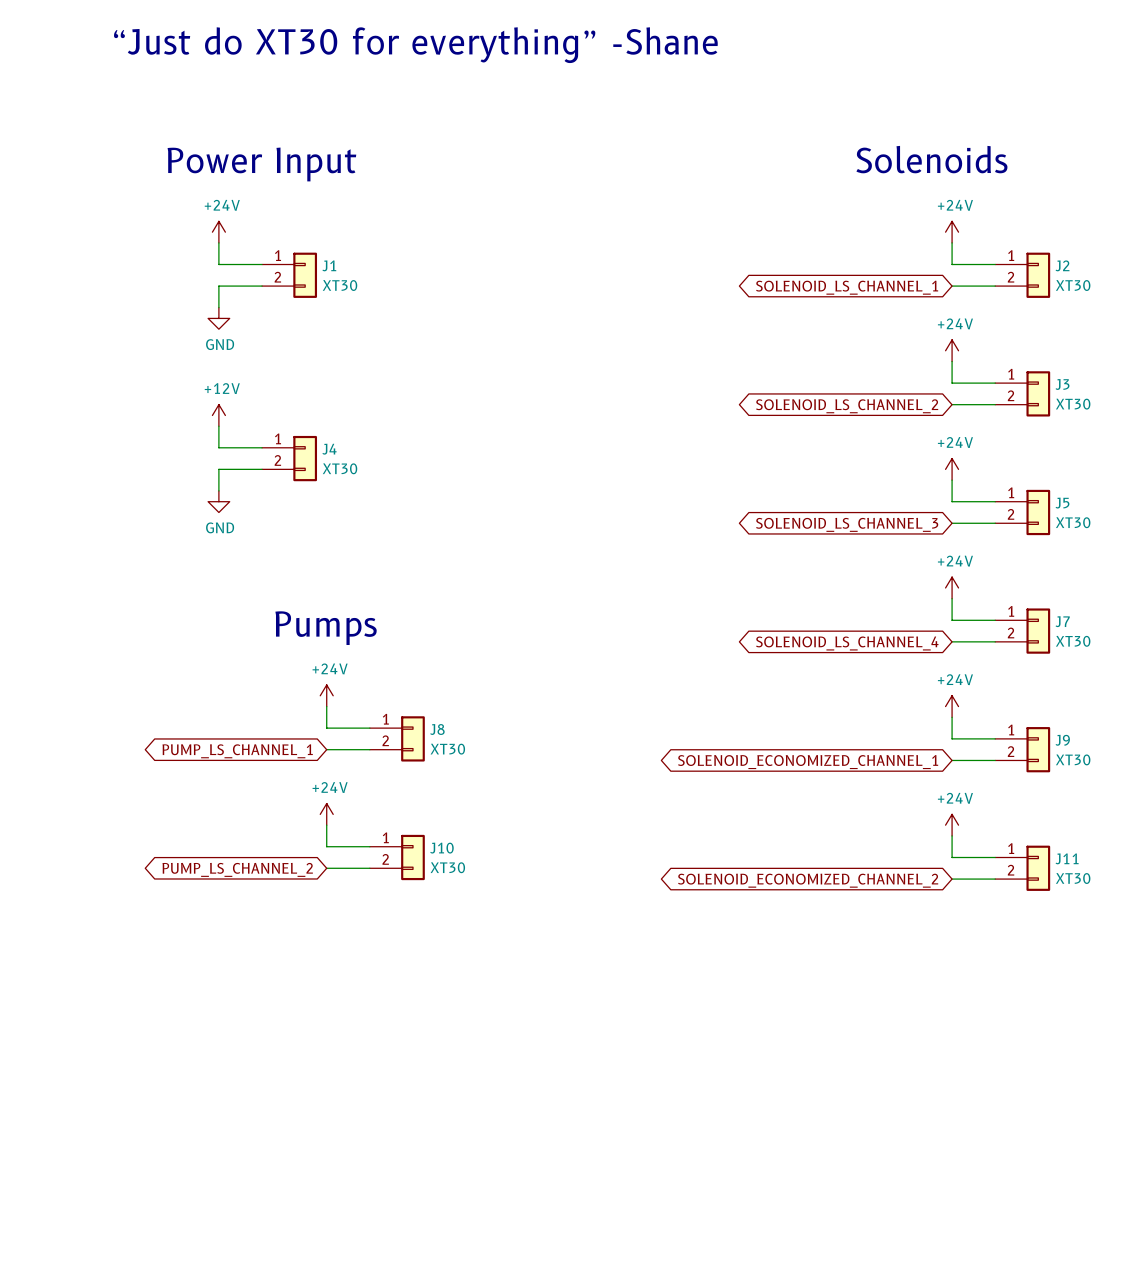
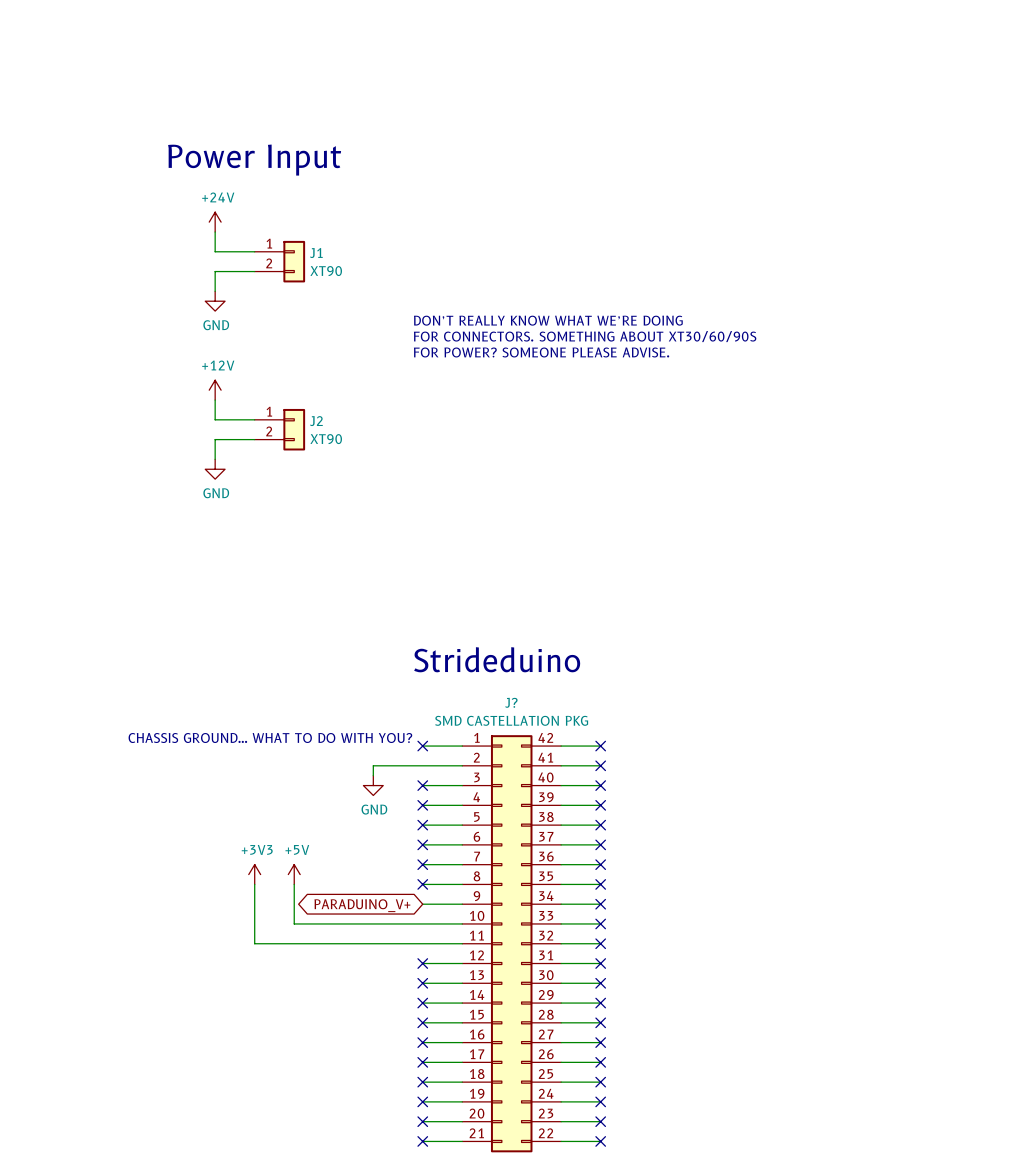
text: “Just do XT30 for everything” -Shane (415, 45) -> none
text: Solenoids (931, 159) -> none
power symbol: +24V (952, 232) -> none
wire: (952, 242) (952, 264) (995, 264) -> none
J2: XT30 (1022, 275) -> none
J1 value: XT30 (340, 285) -> XT90 (326, 271)
wire: (952, 286) (995, 286) -> none
global label: SOLENOID_LS_CHANNEL_1 (847, 287) -> none
text: none -> DON’T REALLY KNOW WHAT WE’RE DOING (548, 320)
power symbol: +24V (952, 350) -> none
text: none -> FOR CONNECTORS. SOMETHING ABOUT XT30/60/90S (585, 336)
wire: (952, 361) (952, 383) (995, 383) -> none
text: none -> FOR POWER? SOMEONE PLEASE ADVISE. (541, 352)
J3: XT30 (1022, 393) -> none
wire: (952, 404) (995, 404) -> none
global label: SOLENOID_LS_CHANNEL_2 (847, 406) -> none
J4 name: J4 (329, 449) -> J2 (316, 421)
J4 value: XT30 (340, 468) -> XT90 (326, 439)
power symbol: +24V (952, 469) -> none
wire: (952, 480) (952, 501) (995, 501) -> none
J5: XT30 (1022, 512) -> none
wire: (952, 523) (995, 523) -> none
global label: SOLENOID_LS_CHANNEL_3 (847, 524) -> none
power symbol: +24V (952, 587) -> none
wire: (952, 598) (952, 620) (995, 620) -> none
text: Pumps (326, 628) -> none
J7: XT30 (1022, 631) -> none
wire: (952, 641) (995, 641) -> none
global label: SOLENOID_LS_CHANNEL_4 (847, 643) -> none
power symbol: +24V (326, 695) -> none
wire: (326, 706) (326, 728) (369, 728) -> none
power symbol: +24V (952, 706) -> none
text: none -> Strideduino (497, 659)
wire: (952, 717) (952, 738) (995, 738) -> none
J8: XT30 (397, 738) -> none
wire: (326, 749) (369, 749) -> (422, 746) (462, 746)
J9: XT30 (1022, 749) -> none
global label: PUMP_LS_CHANNEL_1 (237, 751) -> none
wire: (952, 760) (995, 760) -> none
global label: SOLENOID_ECONOMIZED_CHANNEL_1 (808, 762) -> none
text: none -> CHASSIS GROUND… WHAT TO DO WITH YOU? (270, 737)
no-connect mark: none -> (422, 746)
wire: none -> (561, 746) (600, 746)
no-connect mark: none -> (600, 746)
power symbol: +24V (326, 814) -> none
wire: (326, 825) (326, 846) (369, 846) -> none
wire: none -> (462, 765) (373, 765) (373, 775)
wire: none -> (561, 765) (600, 765)
no-connect mark: none -> (600, 765)
power symbol: +24V (952, 825) -> none
wire: (952, 835) (952, 857) (995, 857) -> none
power symbol: none -> GND (373, 785)
wire: none -> (422, 785) (462, 785)
no-connect mark: none -> (422, 785)
wire: none -> (561, 785) (600, 785)
no-connect mark: none -> (600, 785)
J10: XT30 (397, 857) -> none
wire: (326, 868) (369, 868) -> (422, 805) (462, 805)
no-connect mark: none -> (422, 805)
wire: none -> (561, 805) (600, 805)
no-connect mark: none -> (600, 805)
J11: XT30 (1022, 868) -> none
global label: PUMP_LS_CHANNEL_2 (237, 869) -> none
wire: (952, 879) (995, 879) -> none
global label: SOLENOID_ECONOMIZED_CHANNEL_2 (808, 880) -> none
wire: none -> (422, 825) (462, 825)
no-connect mark: none -> (422, 825)
wire: none -> (561, 825) (600, 825)
no-connect mark: none -> (600, 825)
wire: none -> (422, 844) (462, 844)
no-connect mark: none -> (422, 844)
wire: none -> (561, 844) (600, 844)
no-connect mark: none -> (600, 844)
wire: none -> (422, 864) (462, 864)
no-connect mark: none -> (422, 864)
wire: none -> (561, 864) (600, 864)
no-connect mark: none -> (600, 864)
power symbol: none -> +3V3 (254, 874)
power symbol: none -> +5V (294, 874)
wire: none -> (254, 884) (254, 943) (462, 943)
wire: none -> (294, 884) (294, 923) (462, 923)
wire: none -> (422, 884) (462, 884)
no-connect mark: none -> (422, 884)
wire: none -> (561, 884) (600, 884)
no-connect mark: none -> (600, 884)
wire: none -> (422, 904) (462, 904)
wire: none -> (561, 904) (600, 904)
no-connect mark: none -> (600, 904)
global label: none -> PARADUINO_V+ (362, 905)
wire: none -> (561, 923) (600, 923)
no-connect mark: none -> (600, 923)
J?: none -> SMD CASTELLATION PKG (511, 943)
wire: none -> (561, 943) (600, 943)
no-connect mark: none -> (600, 943)
wire: none -> (422, 963) (462, 963)
no-connect mark: none -> (422, 963)
wire: none -> (561, 963) (600, 963)
no-connect mark: none -> (600, 963)
wire: none -> (422, 983) (462, 983)
no-connect mark: none -> (422, 983)
wire: none -> (561, 983) (600, 983)
no-connect mark: none -> (600, 983)
wire: none -> (422, 1003) (462, 1003)
no-connect mark: none -> (422, 1003)
wire: none -> (561, 1003) (600, 1003)
no-connect mark: none -> (600, 1003)
wire: none -> (422, 1022) (462, 1022)
no-connect mark: none -> (422, 1022)
wire: none -> (561, 1022) (600, 1022)
no-connect mark: none -> (600, 1022)
wire: none -> (422, 1042) (462, 1042)
no-connect mark: none -> (422, 1042)
wire: none -> (561, 1042) (600, 1042)
no-connect mark: none -> (600, 1042)
wire: none -> (422, 1062) (462, 1062)
no-connect mark: none -> (422, 1062)
wire: none -> (561, 1062) (600, 1062)
no-connect mark: none -> (600, 1062)
wire: none -> (422, 1082) (462, 1082)
no-connect mark: none -> (422, 1082)
wire: none -> (561, 1082) (600, 1082)
no-connect mark: none -> (600, 1082)
wire: none -> (422, 1101) (462, 1101)
no-connect mark: none -> (422, 1101)
wire: none -> (561, 1101) (600, 1101)
no-connect mark: none -> (600, 1101)
wire: none -> (422, 1121) (462, 1121)
no-connect mark: none -> (422, 1121)
wire: none -> (561, 1121) (600, 1121)
no-connect mark: none -> (600, 1121)
wire: none -> (422, 1141) (462, 1141)
no-connect mark: none -> (422, 1141)
wire: none -> (561, 1141) (600, 1141)
no-connect mark: none -> (600, 1141)

